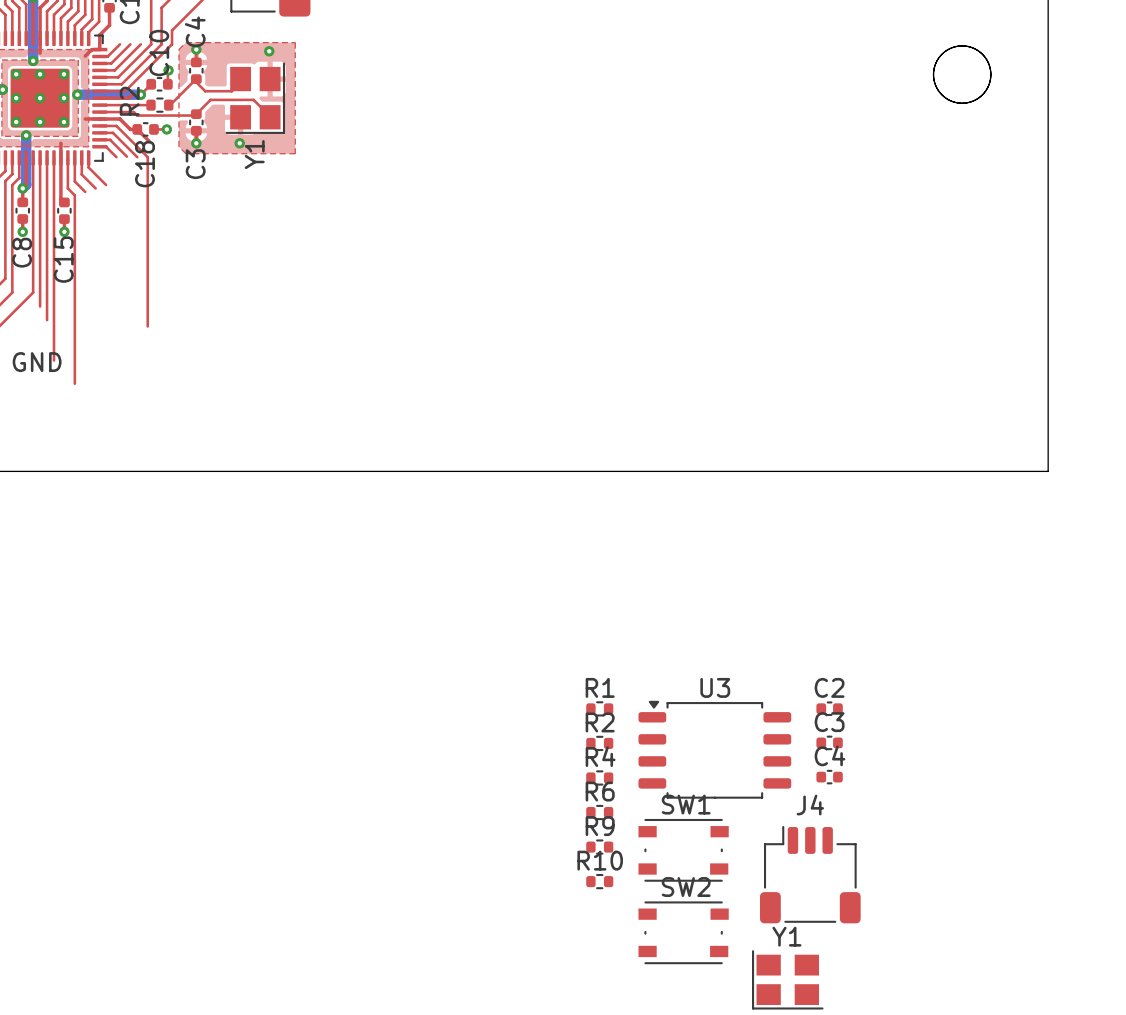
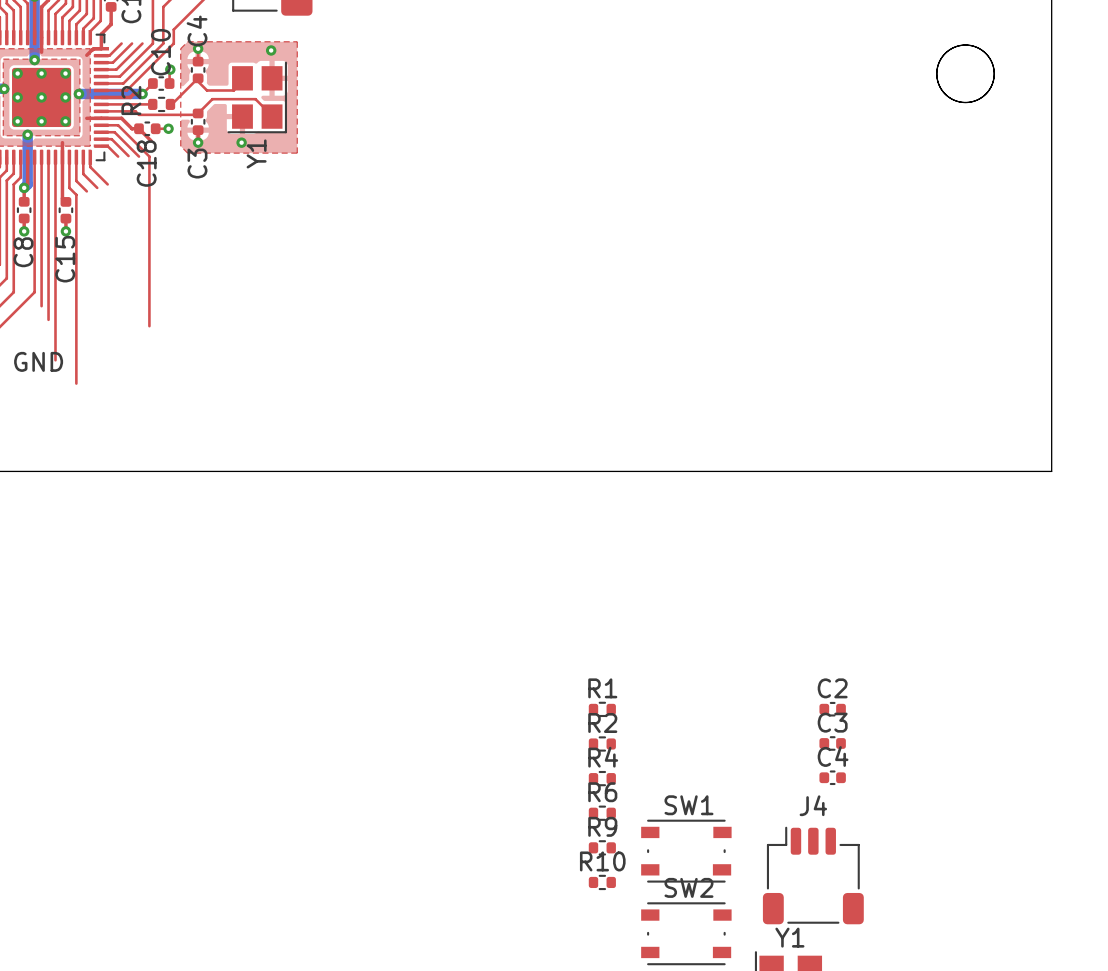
U3: (714, 749) -> none

